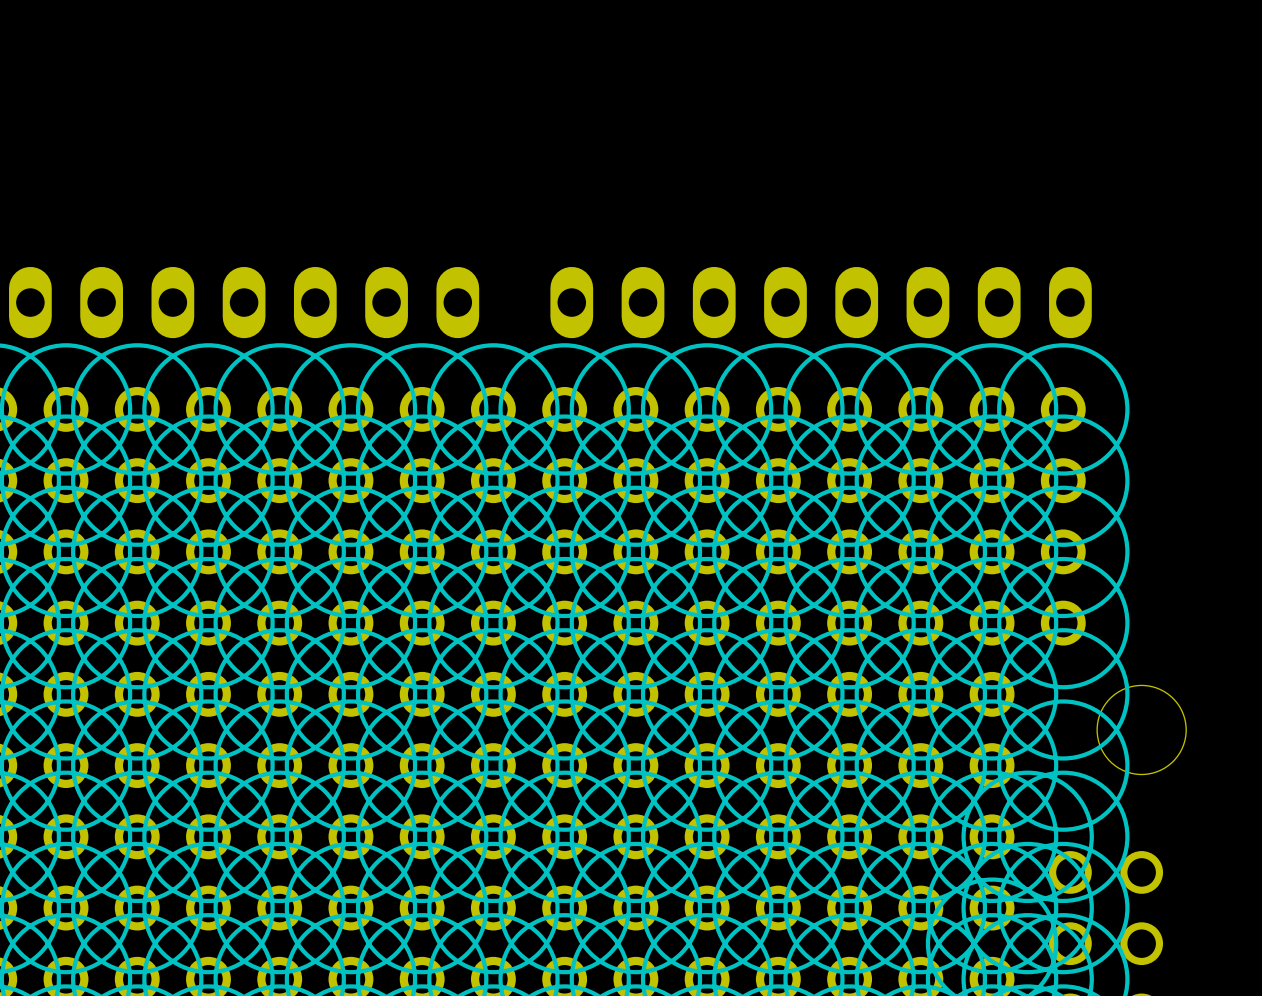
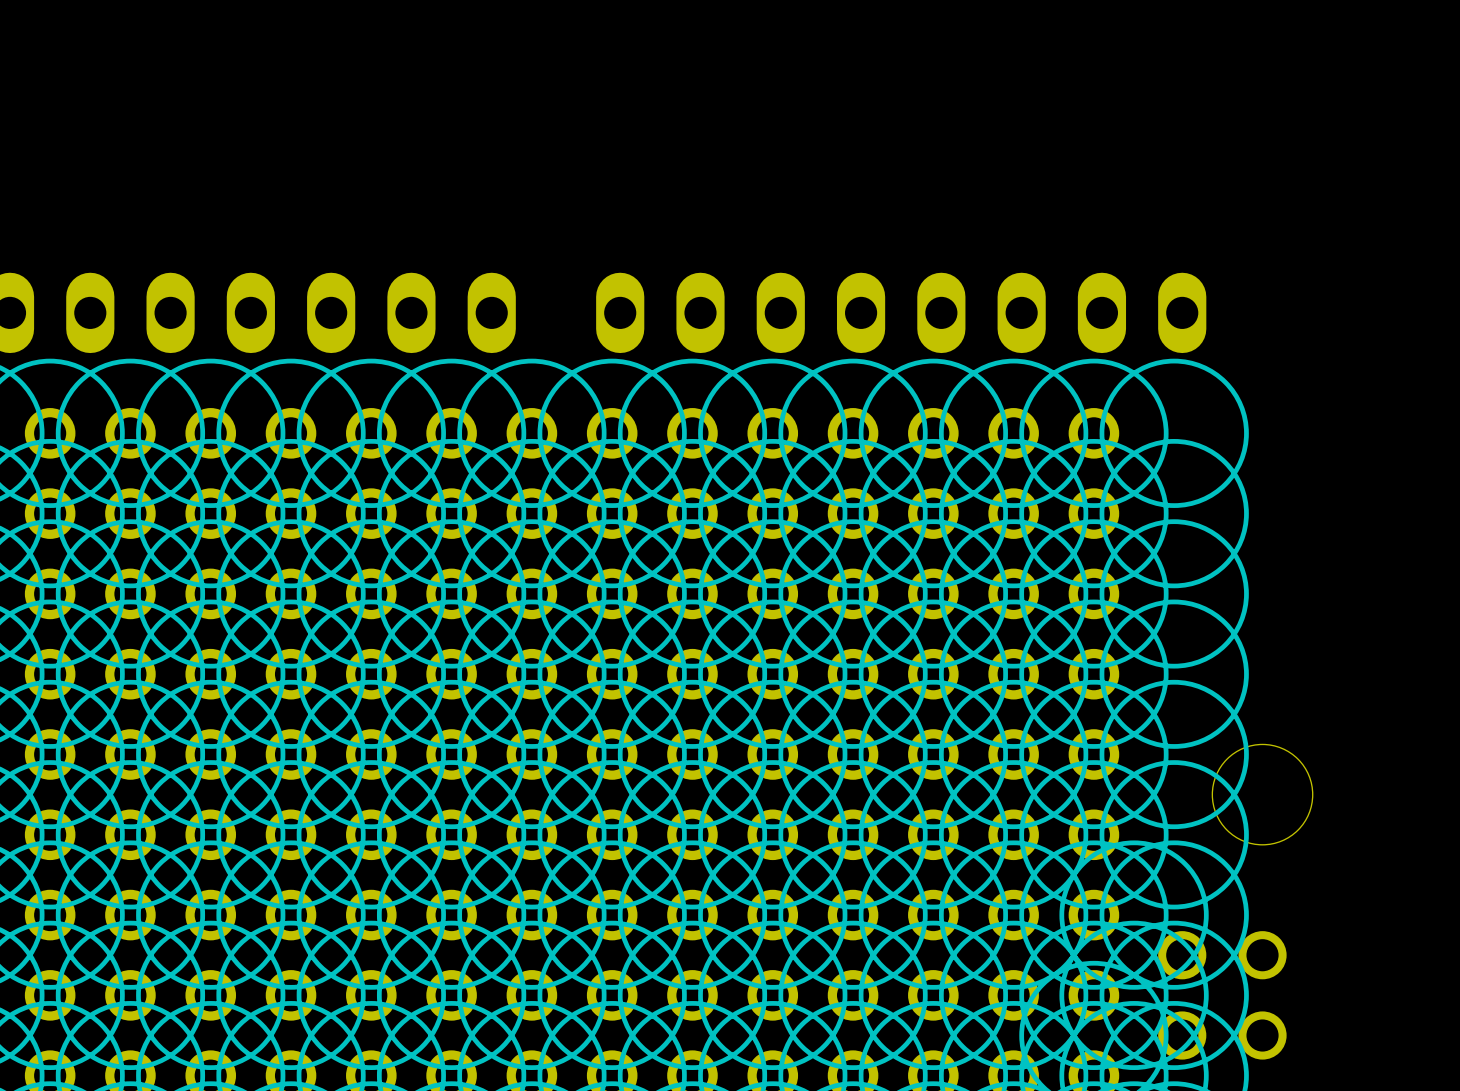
drawing: none -> [1099, 358, 1249, 749]
part: (1063, 409) -> none
part: (1063, 480) -> none
part: (1063, 551) -> none
part: (1063, 623) -> none

